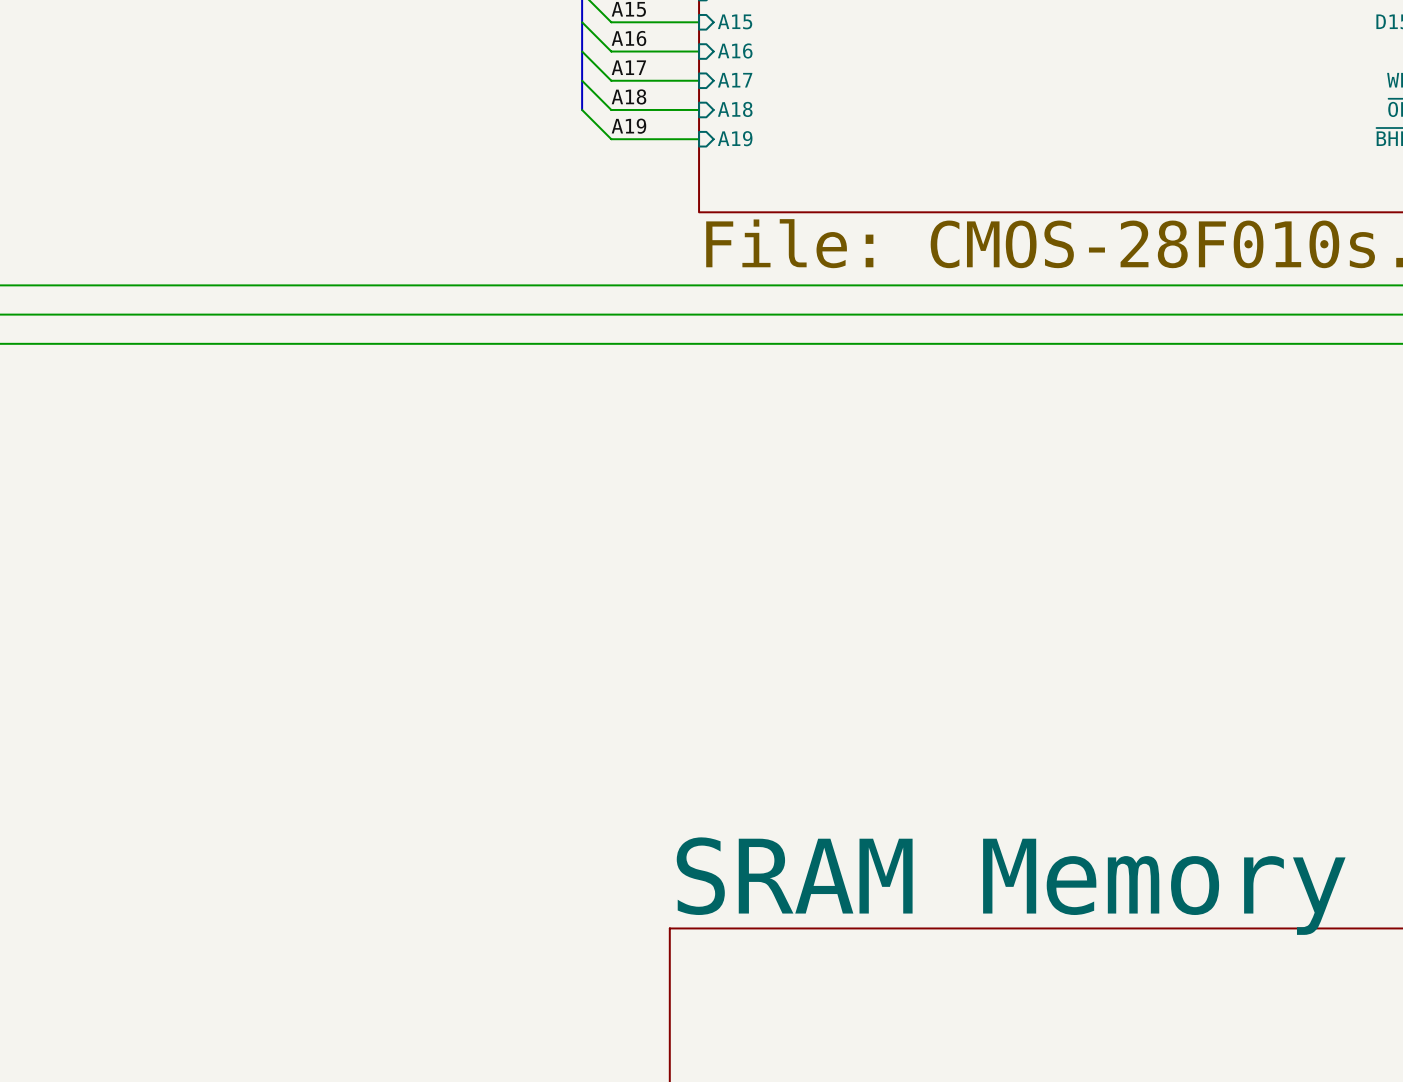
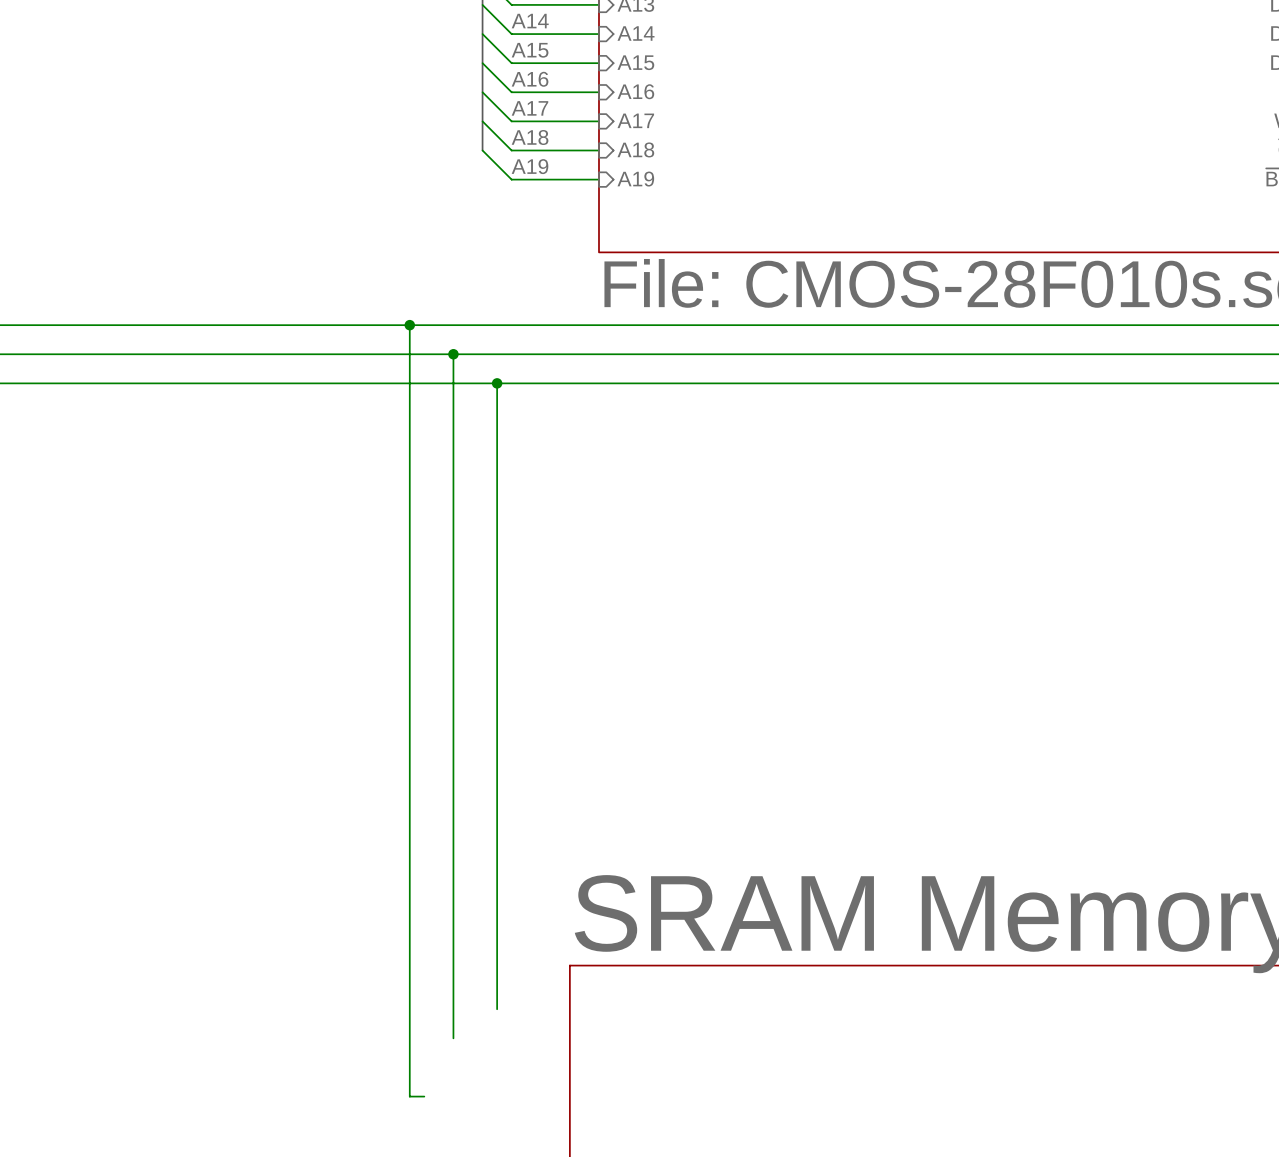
wire: none -> (409, 325) (409, 1096) (424, 1096)
junction: none -> (409, 325)
wire: none -> (453, 354) (453, 1038)
junction: none -> (453, 354)
wire: none -> (497, 383) (497, 1009)
junction: none -> (497, 383)

